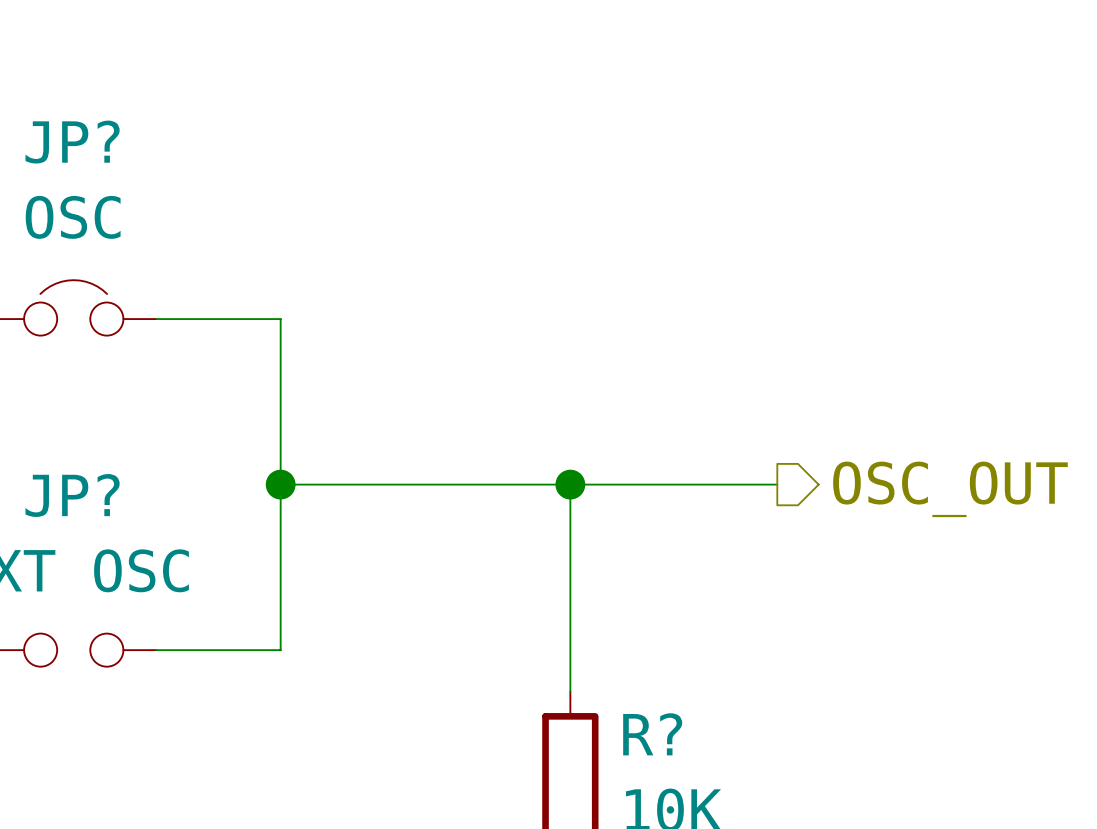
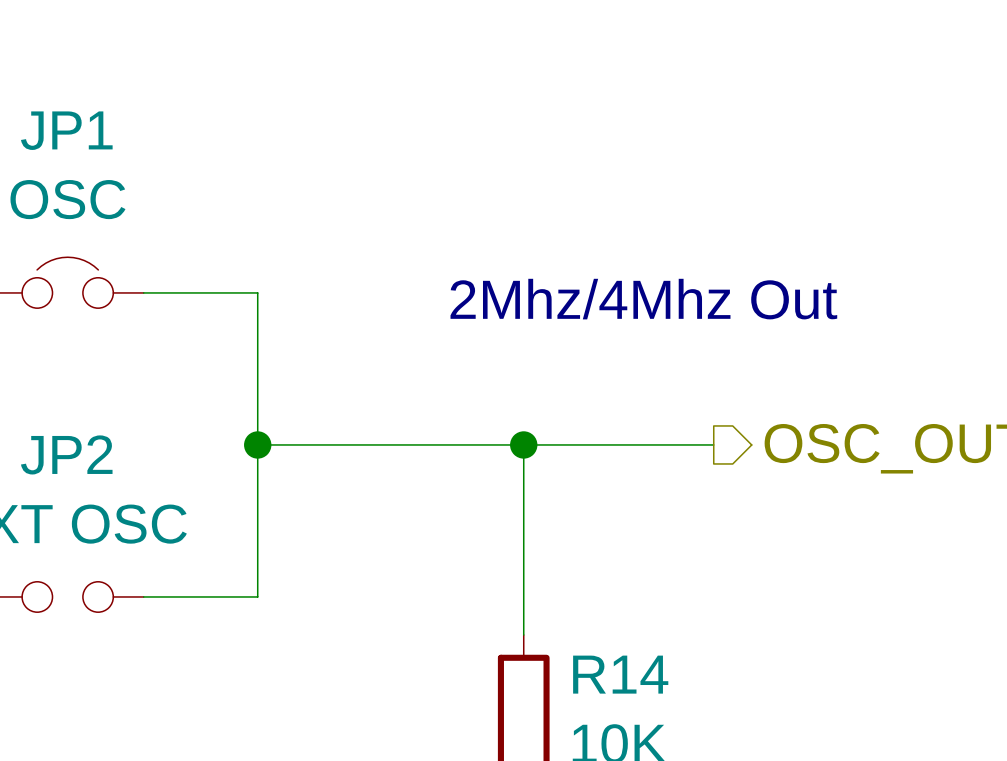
JP? name: JP? (72, 142) -> JP1 (66, 130)
text: none -> 2Mhz/4Mhz Out (643, 299)
JP? name: JP? (72, 495) -> JP2 (66, 454)
R? name: R? (652, 734) -> R14 (620, 674)

